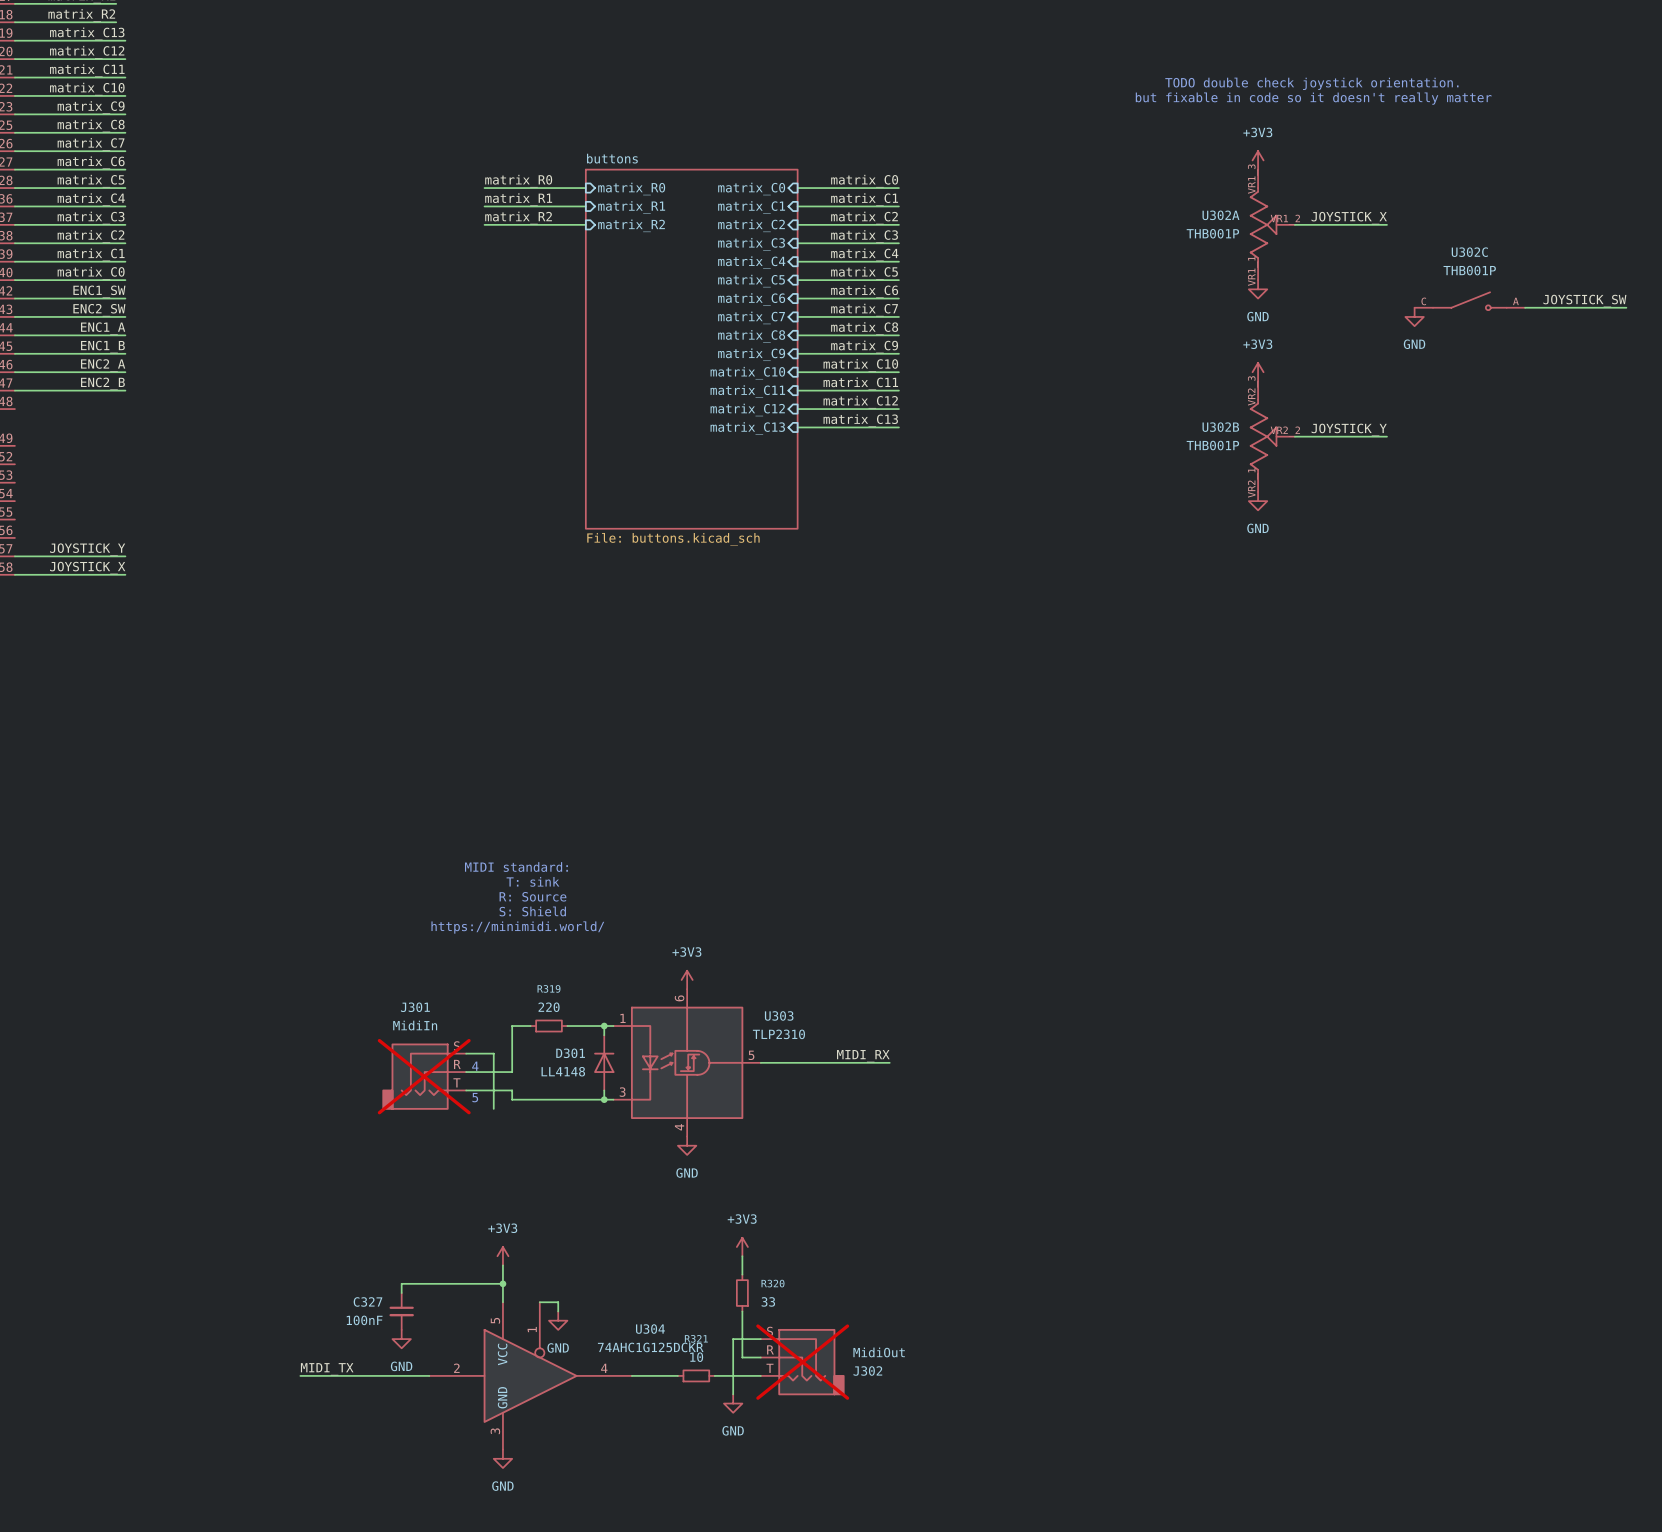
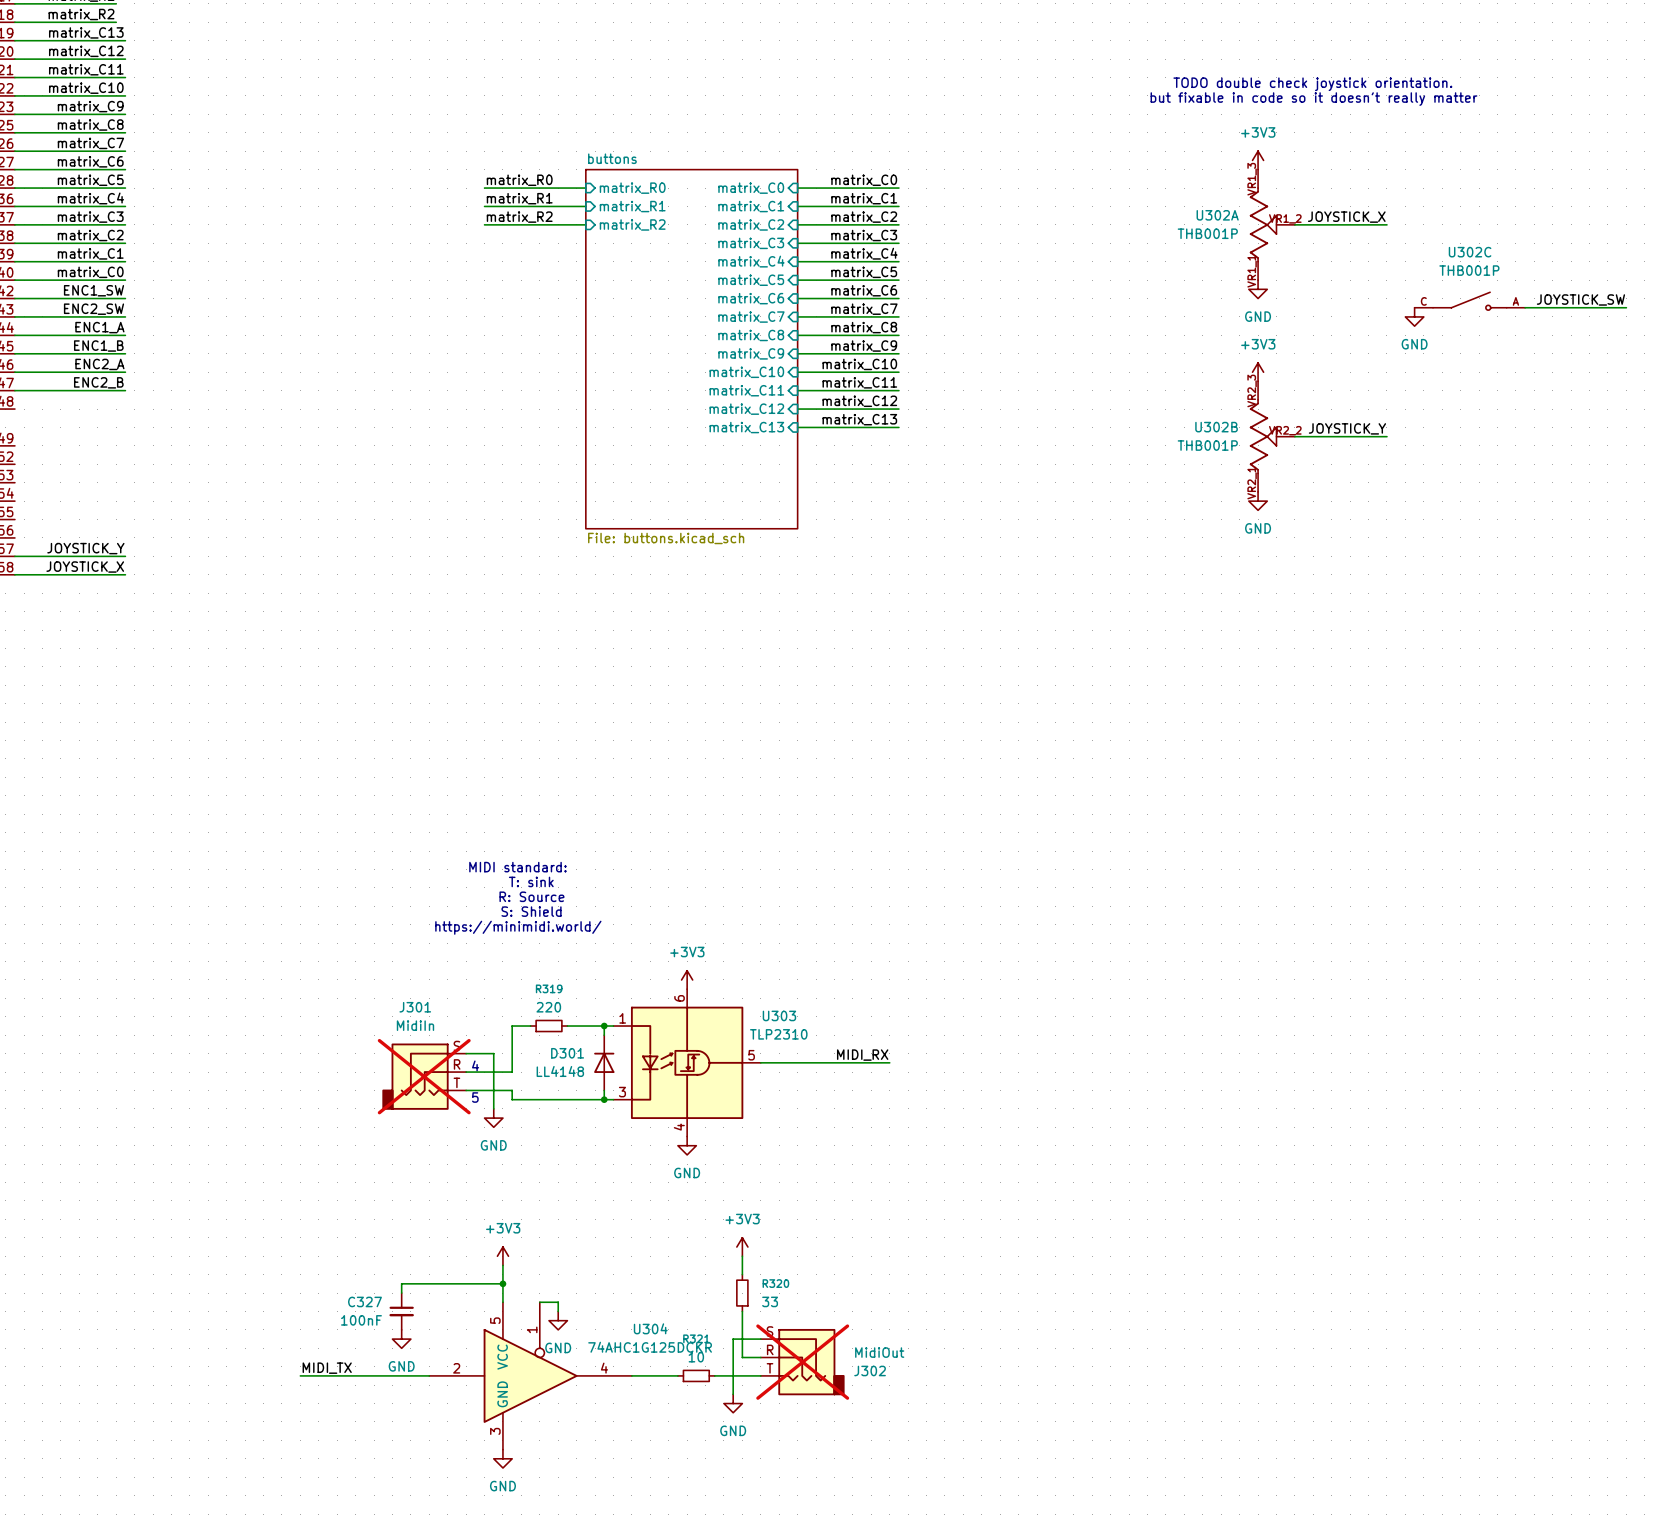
power symbol: none -> GND (493, 1118)

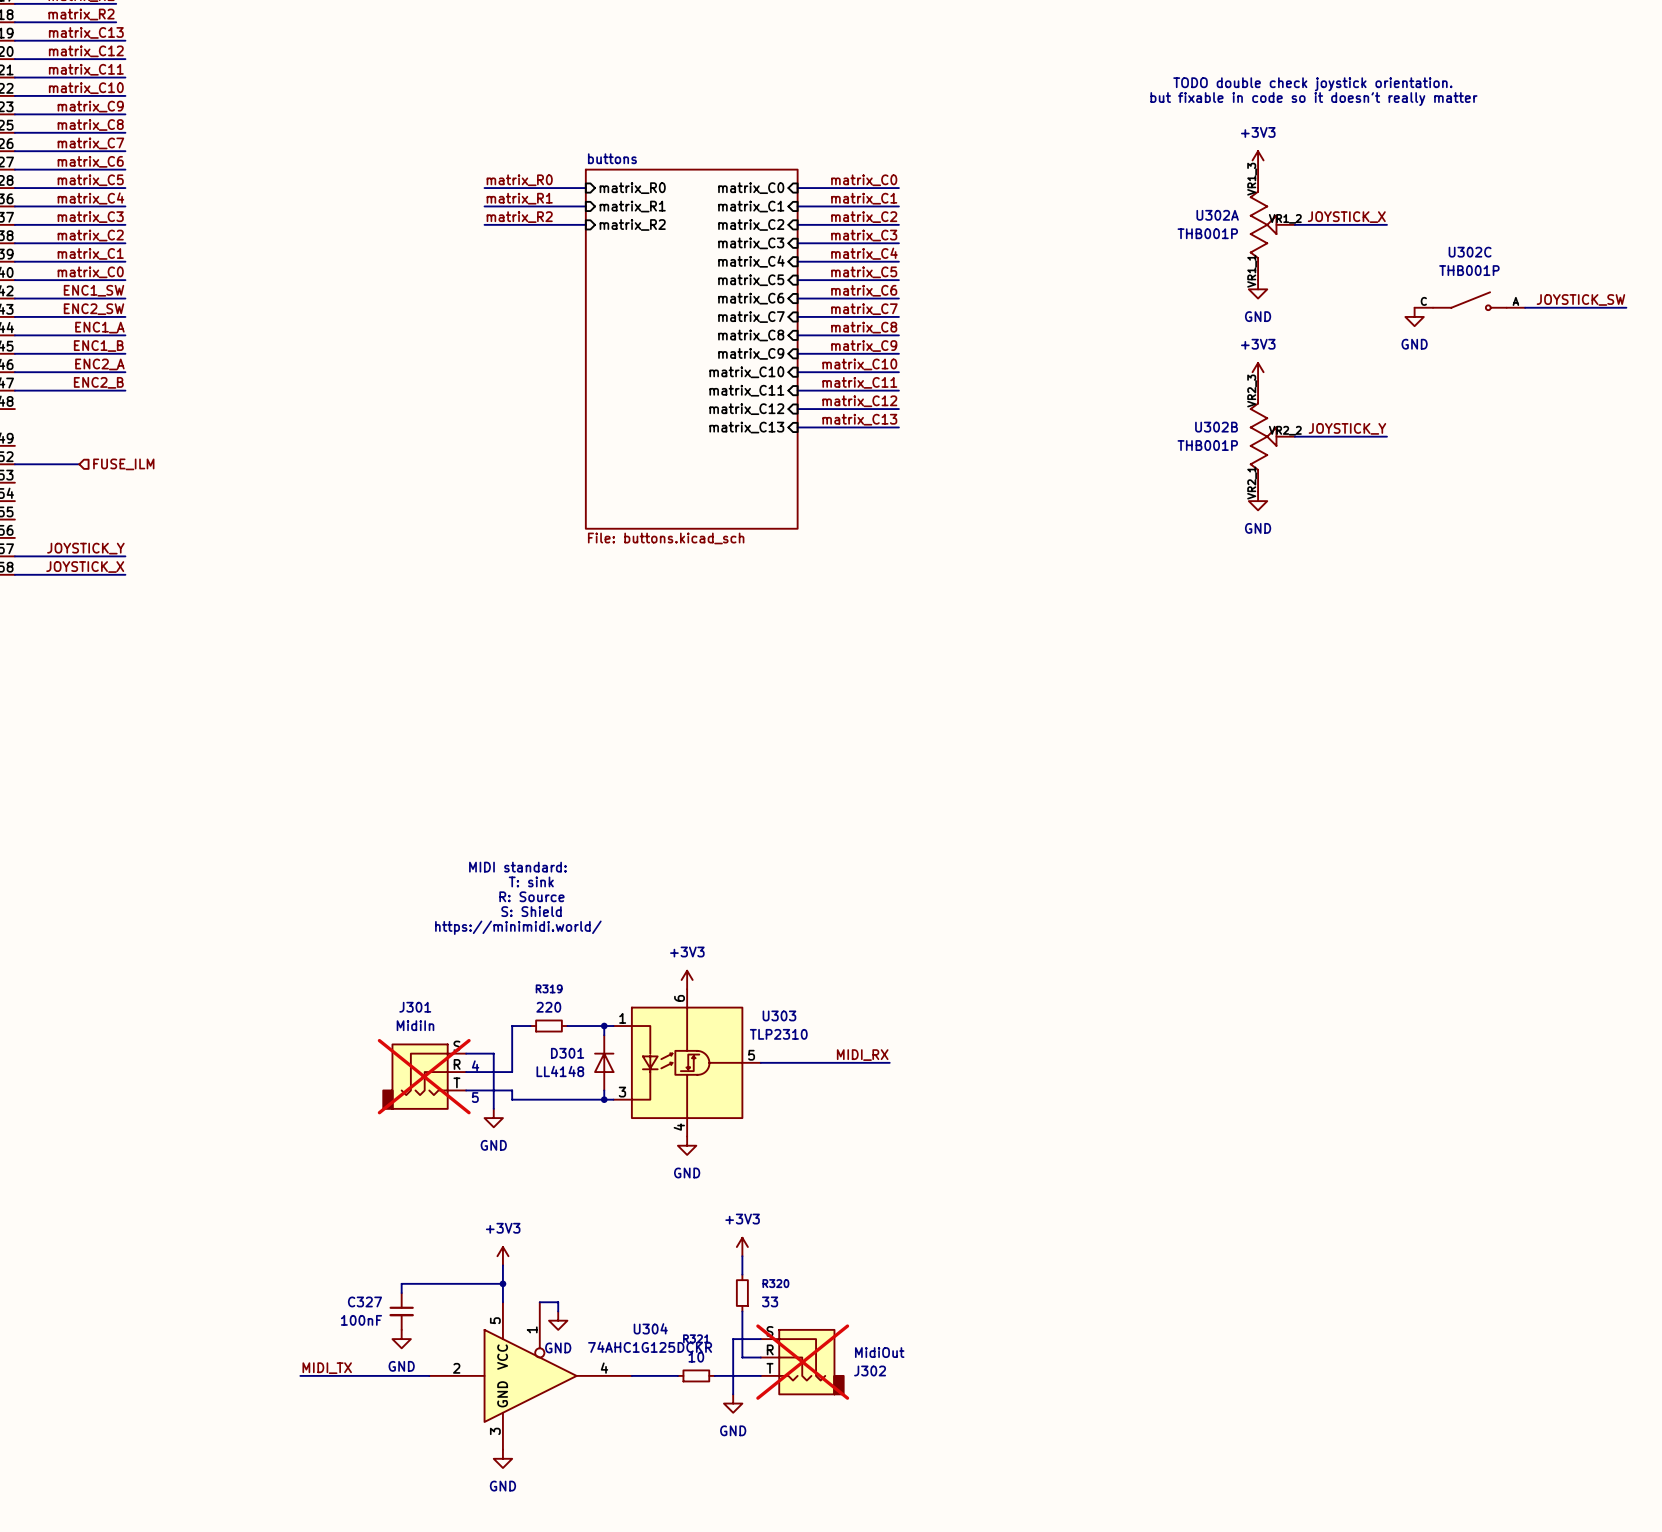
wire: none -> (14, 464) (79, 464)
hierarchical label: none -> FUSE_ILM (123, 464)

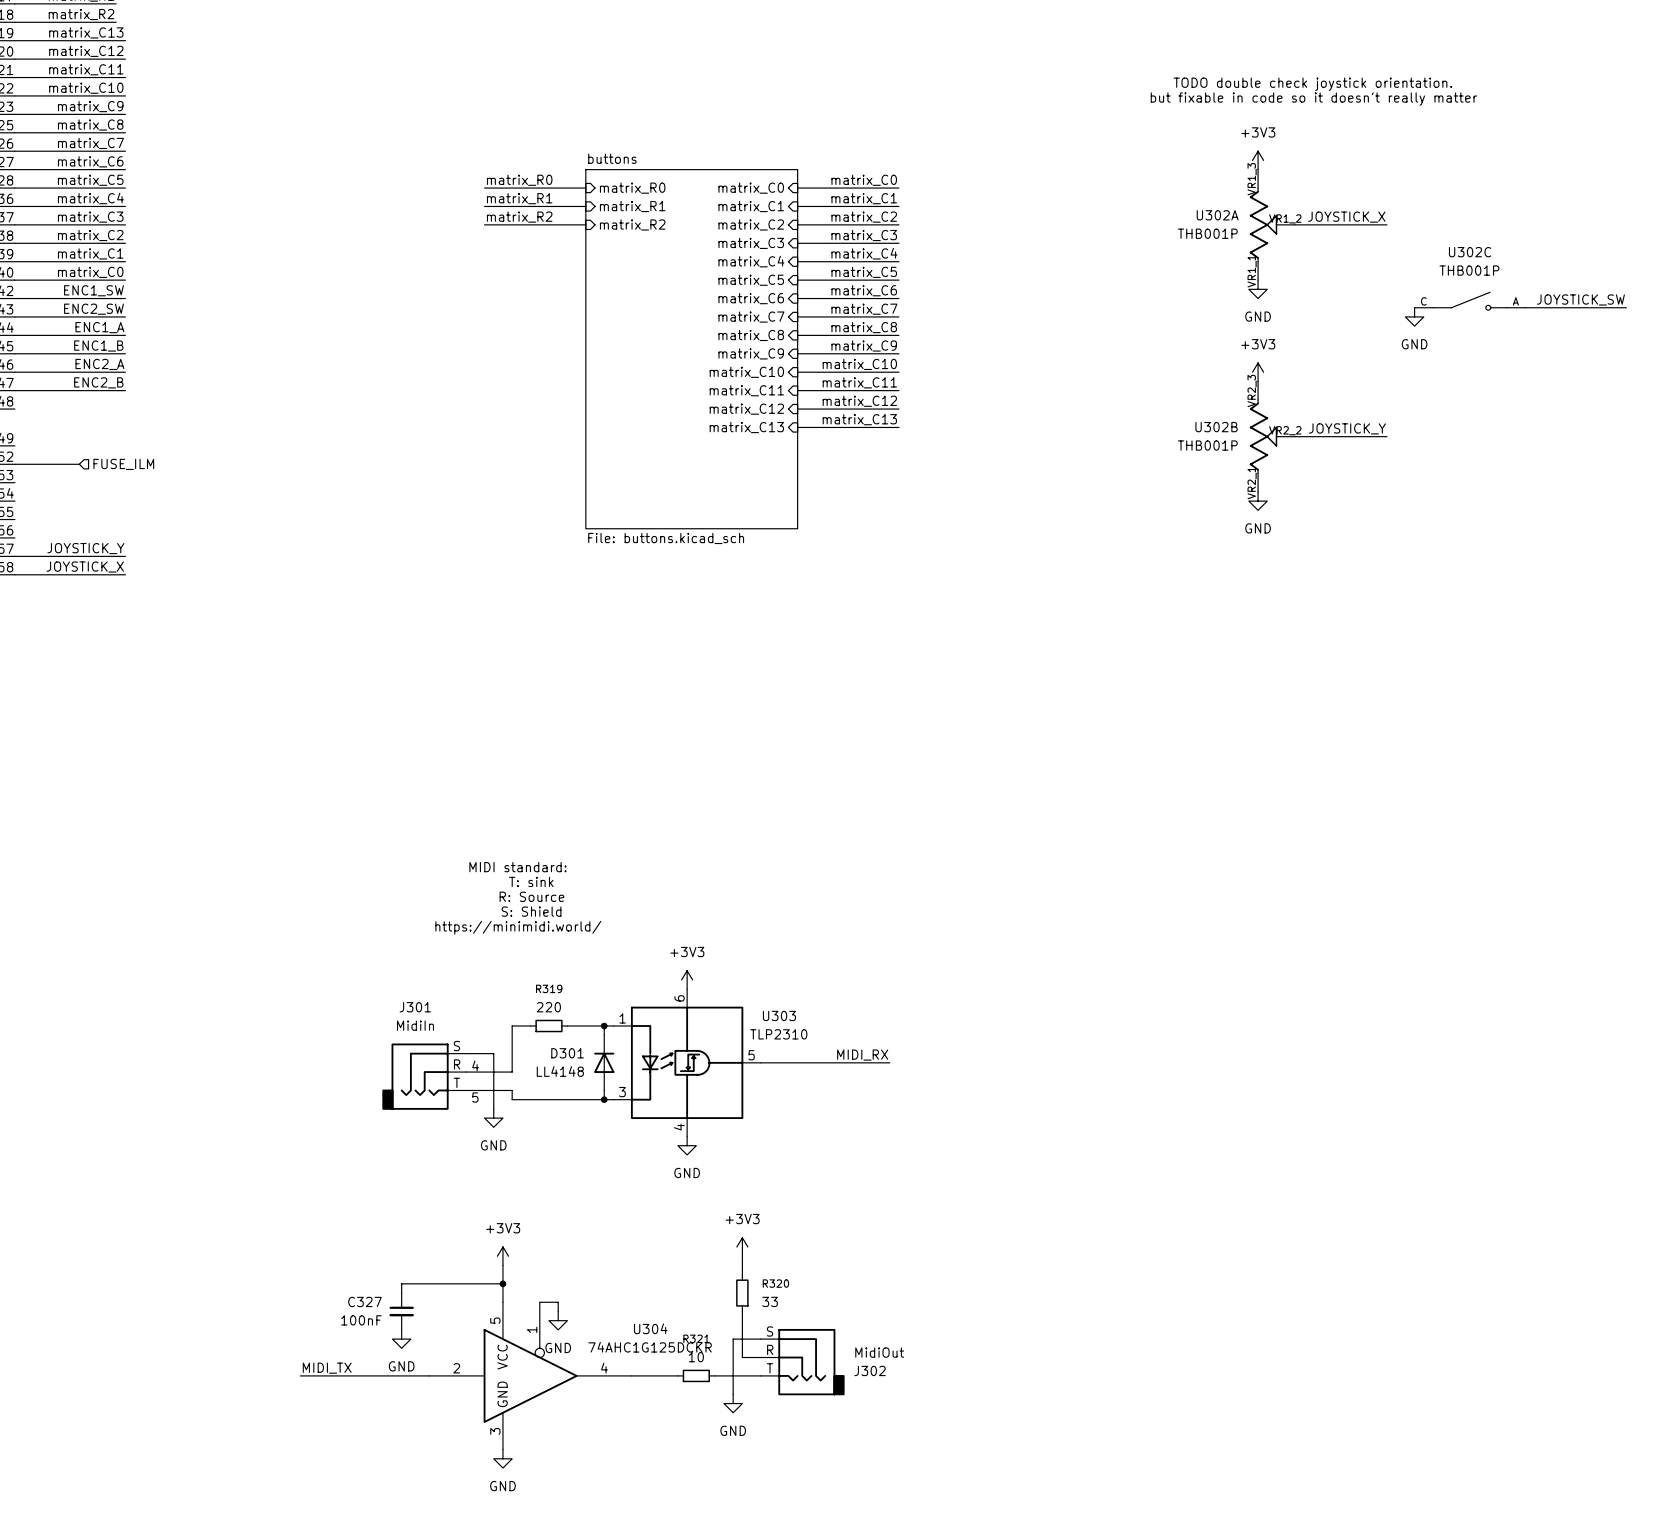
J301 do-not-place cross: (424, 1076) -> none
J302 do-not-place cross: (802, 1362) -> none

